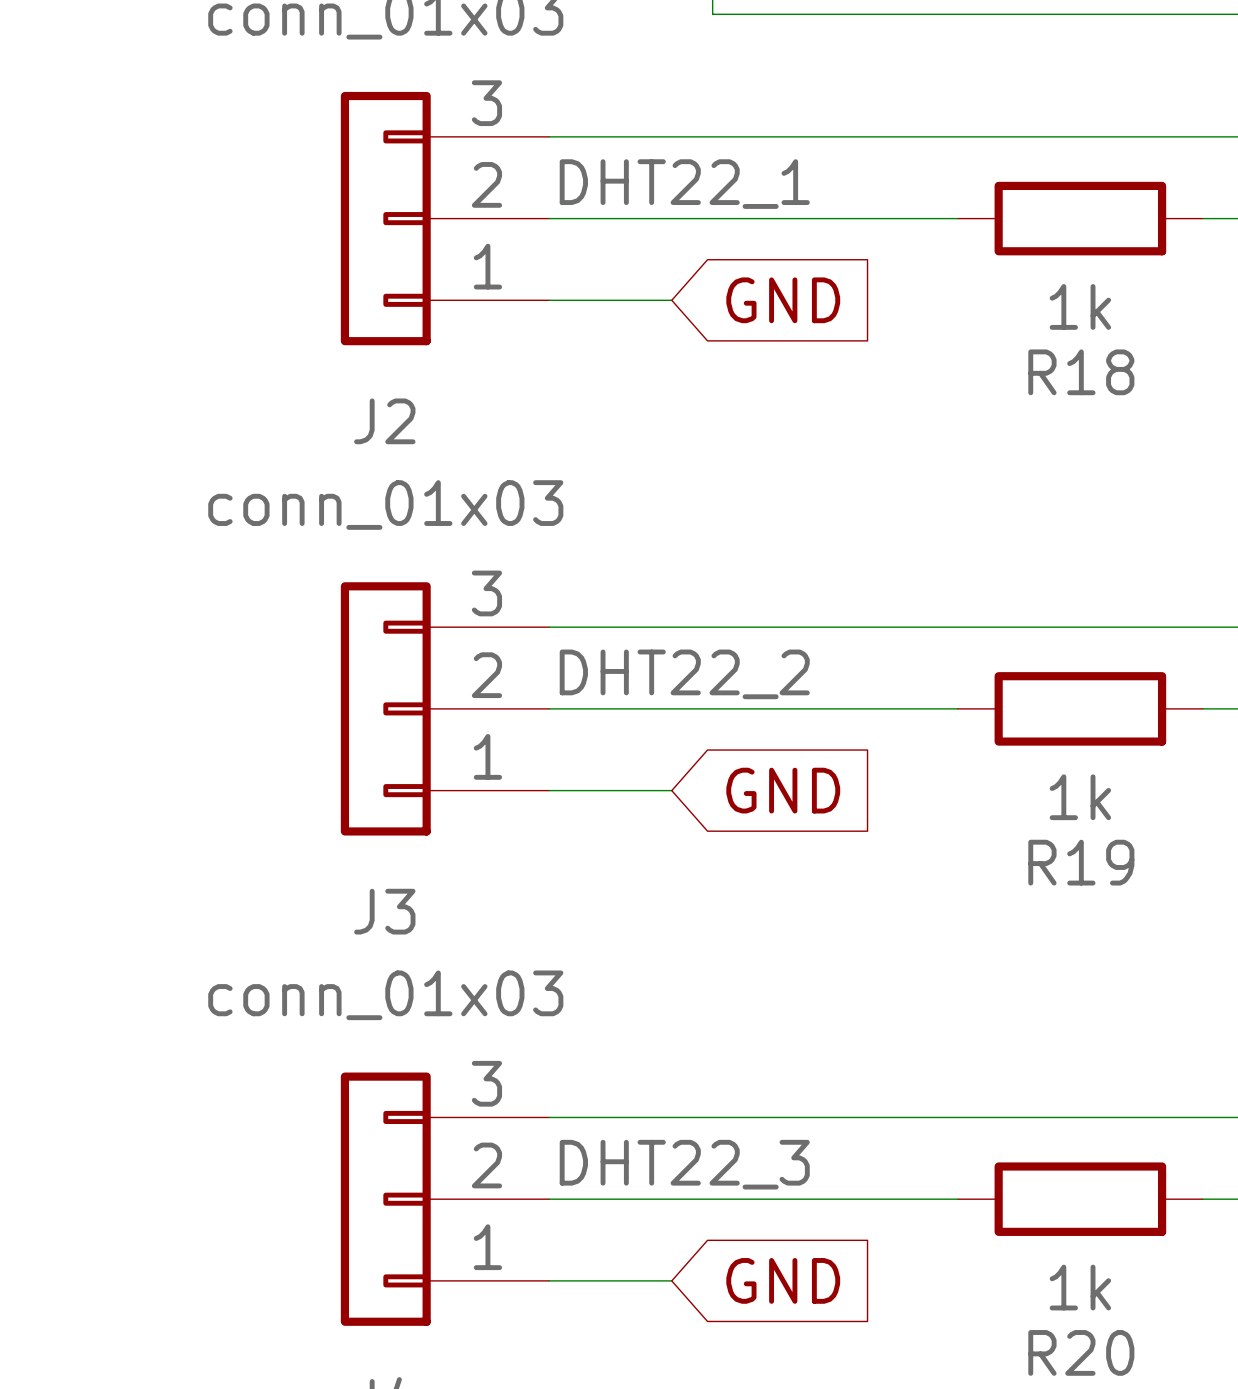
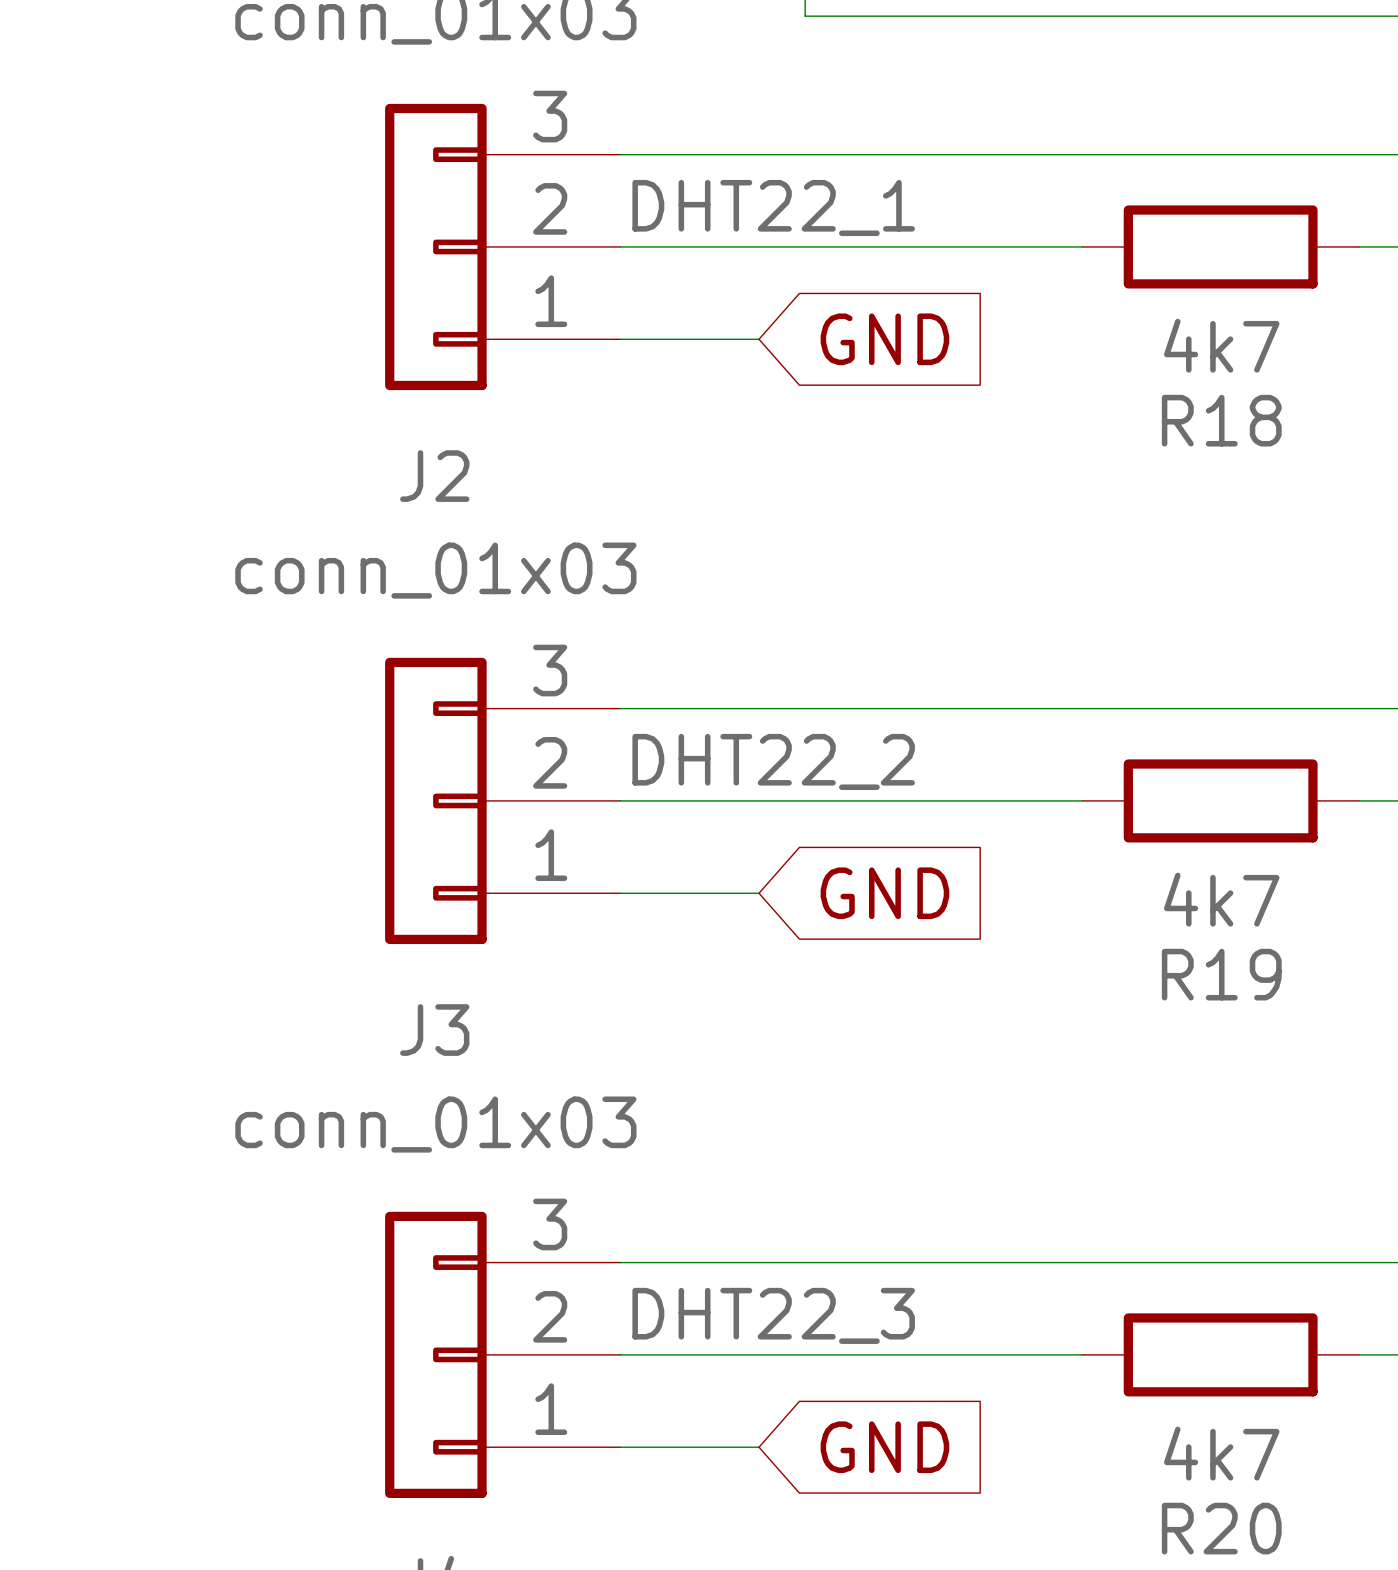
R18 value: 1k (1080, 306) -> 4k7 (1221, 345)
R19 value: 1k (1080, 797) -> 4k7 (1221, 899)
R20 value: 1k (1080, 1287) -> 4k7 (1221, 1453)

